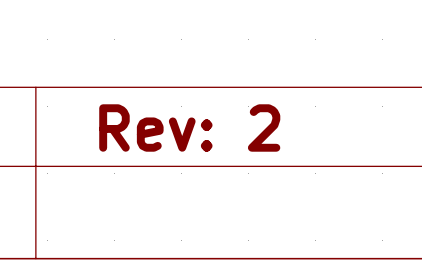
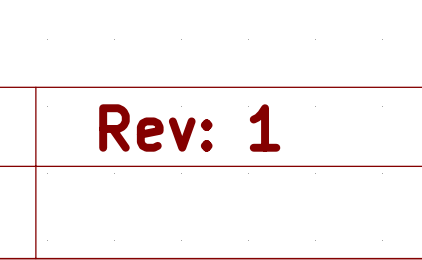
title block: Rev: 2 (189, 128) -> Rev: 1 (189, 128)

